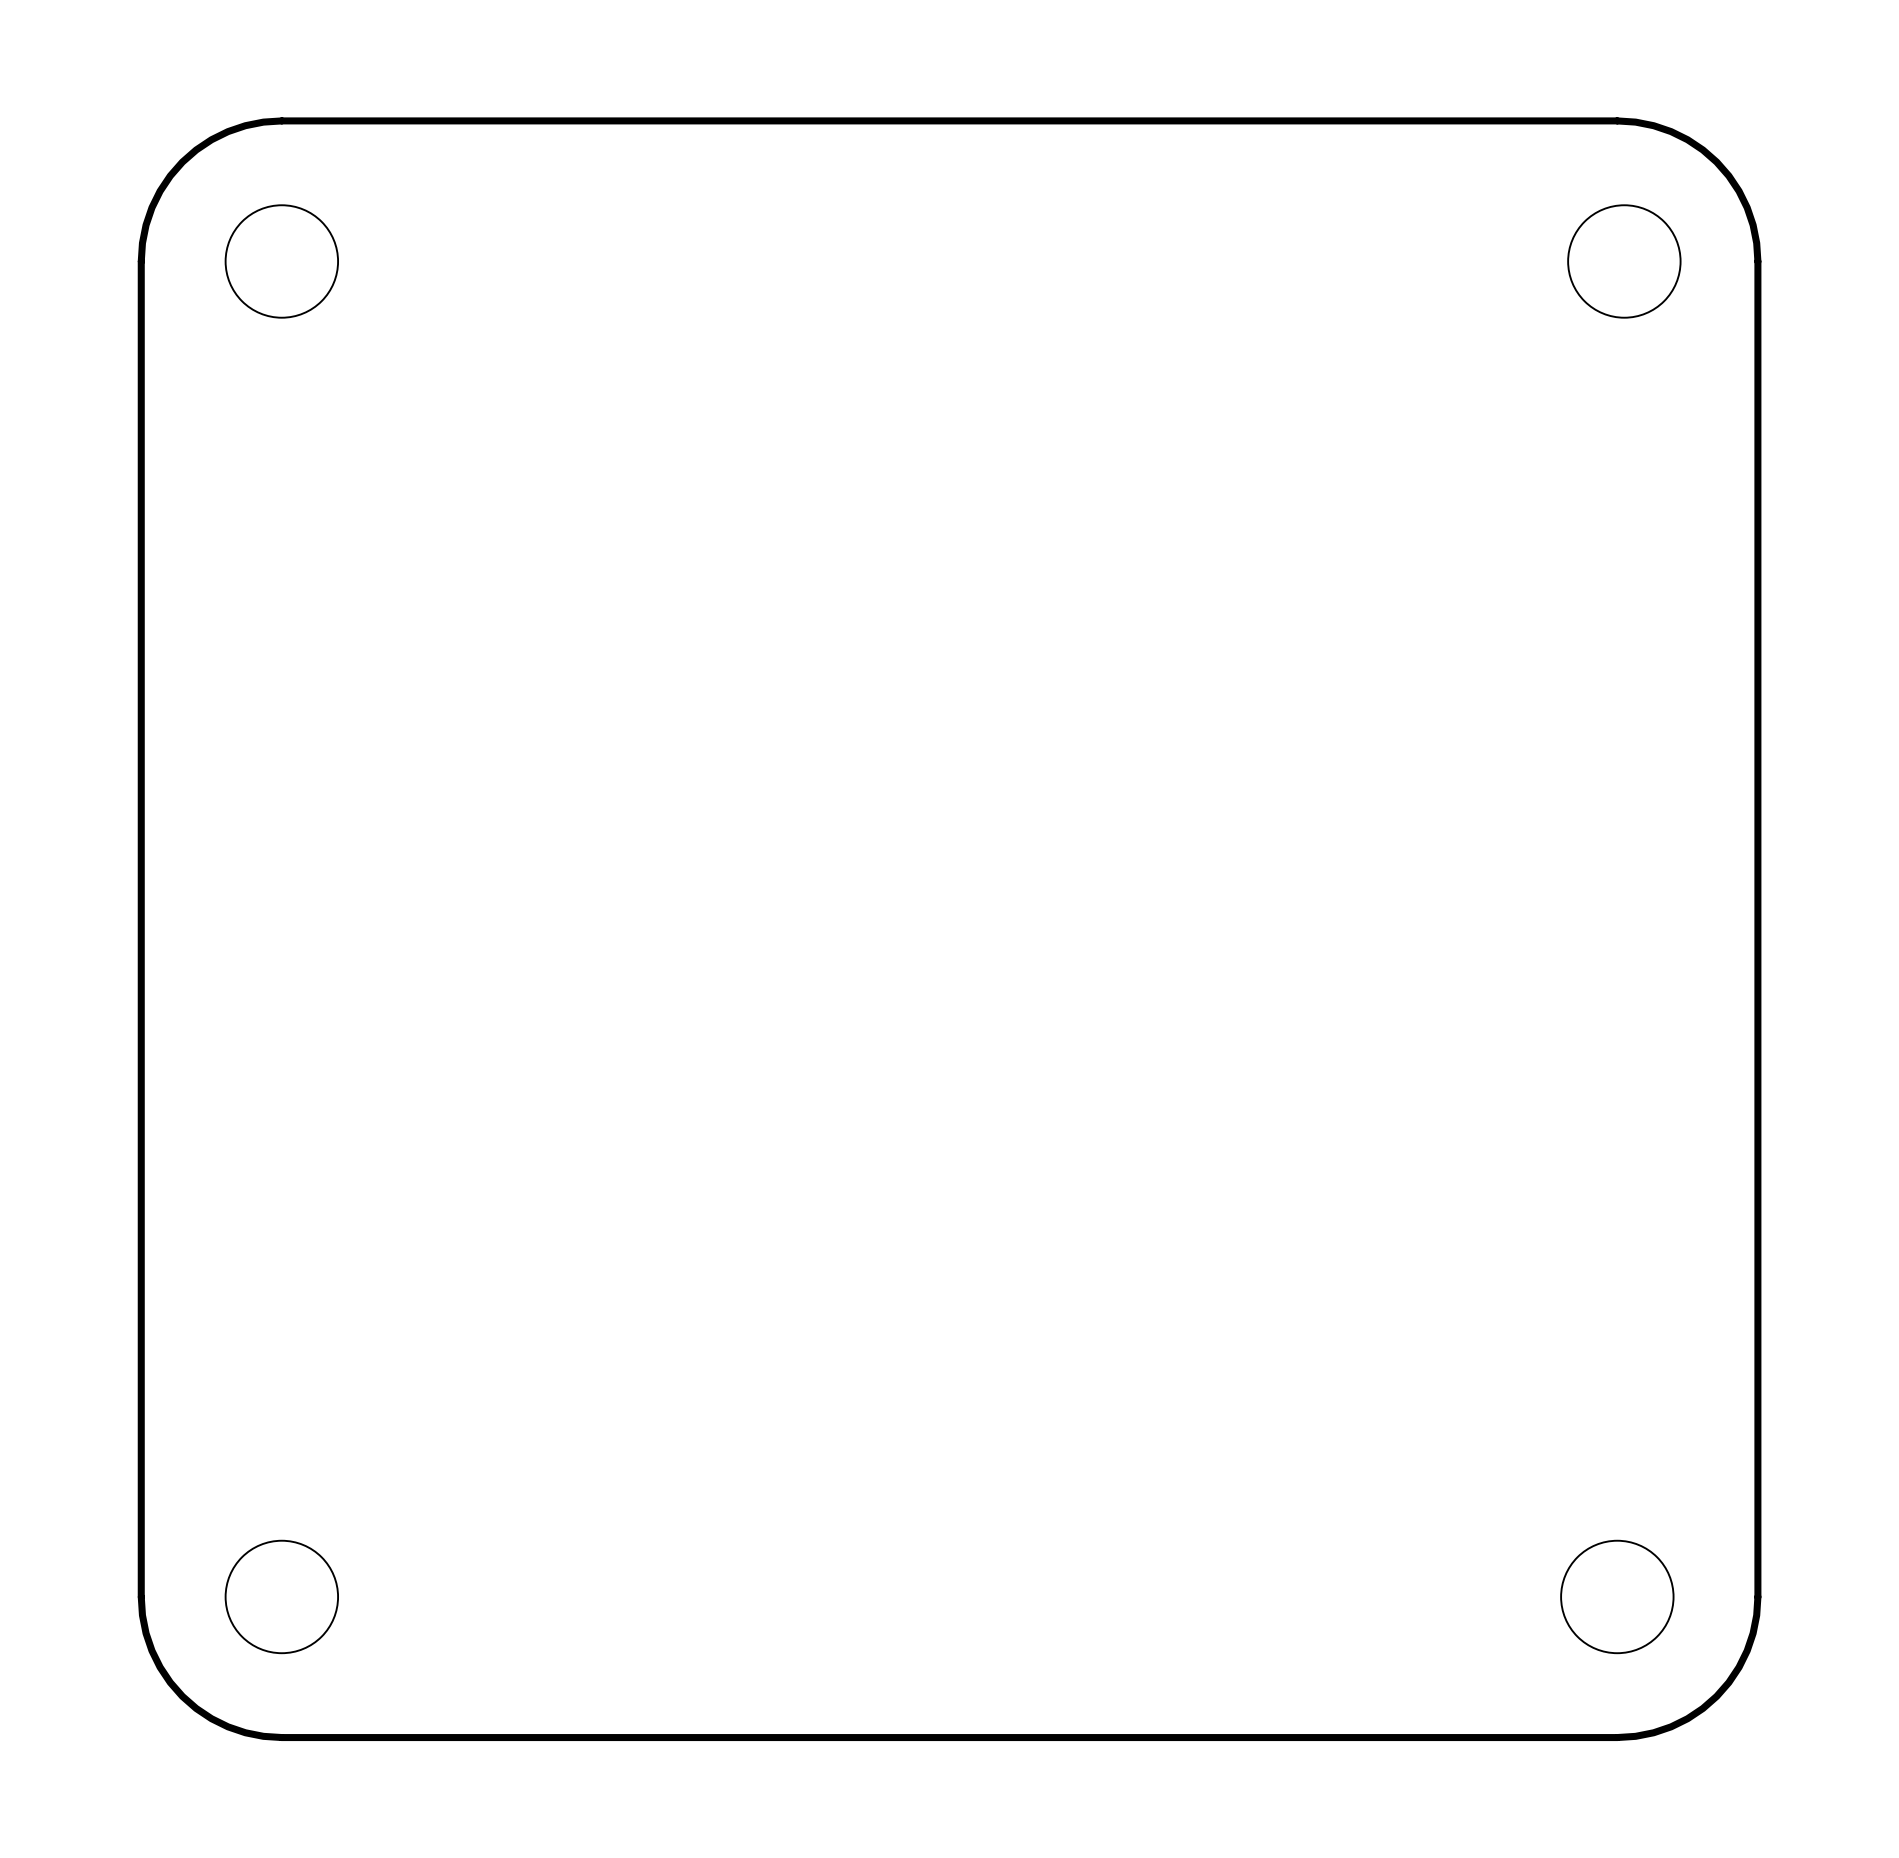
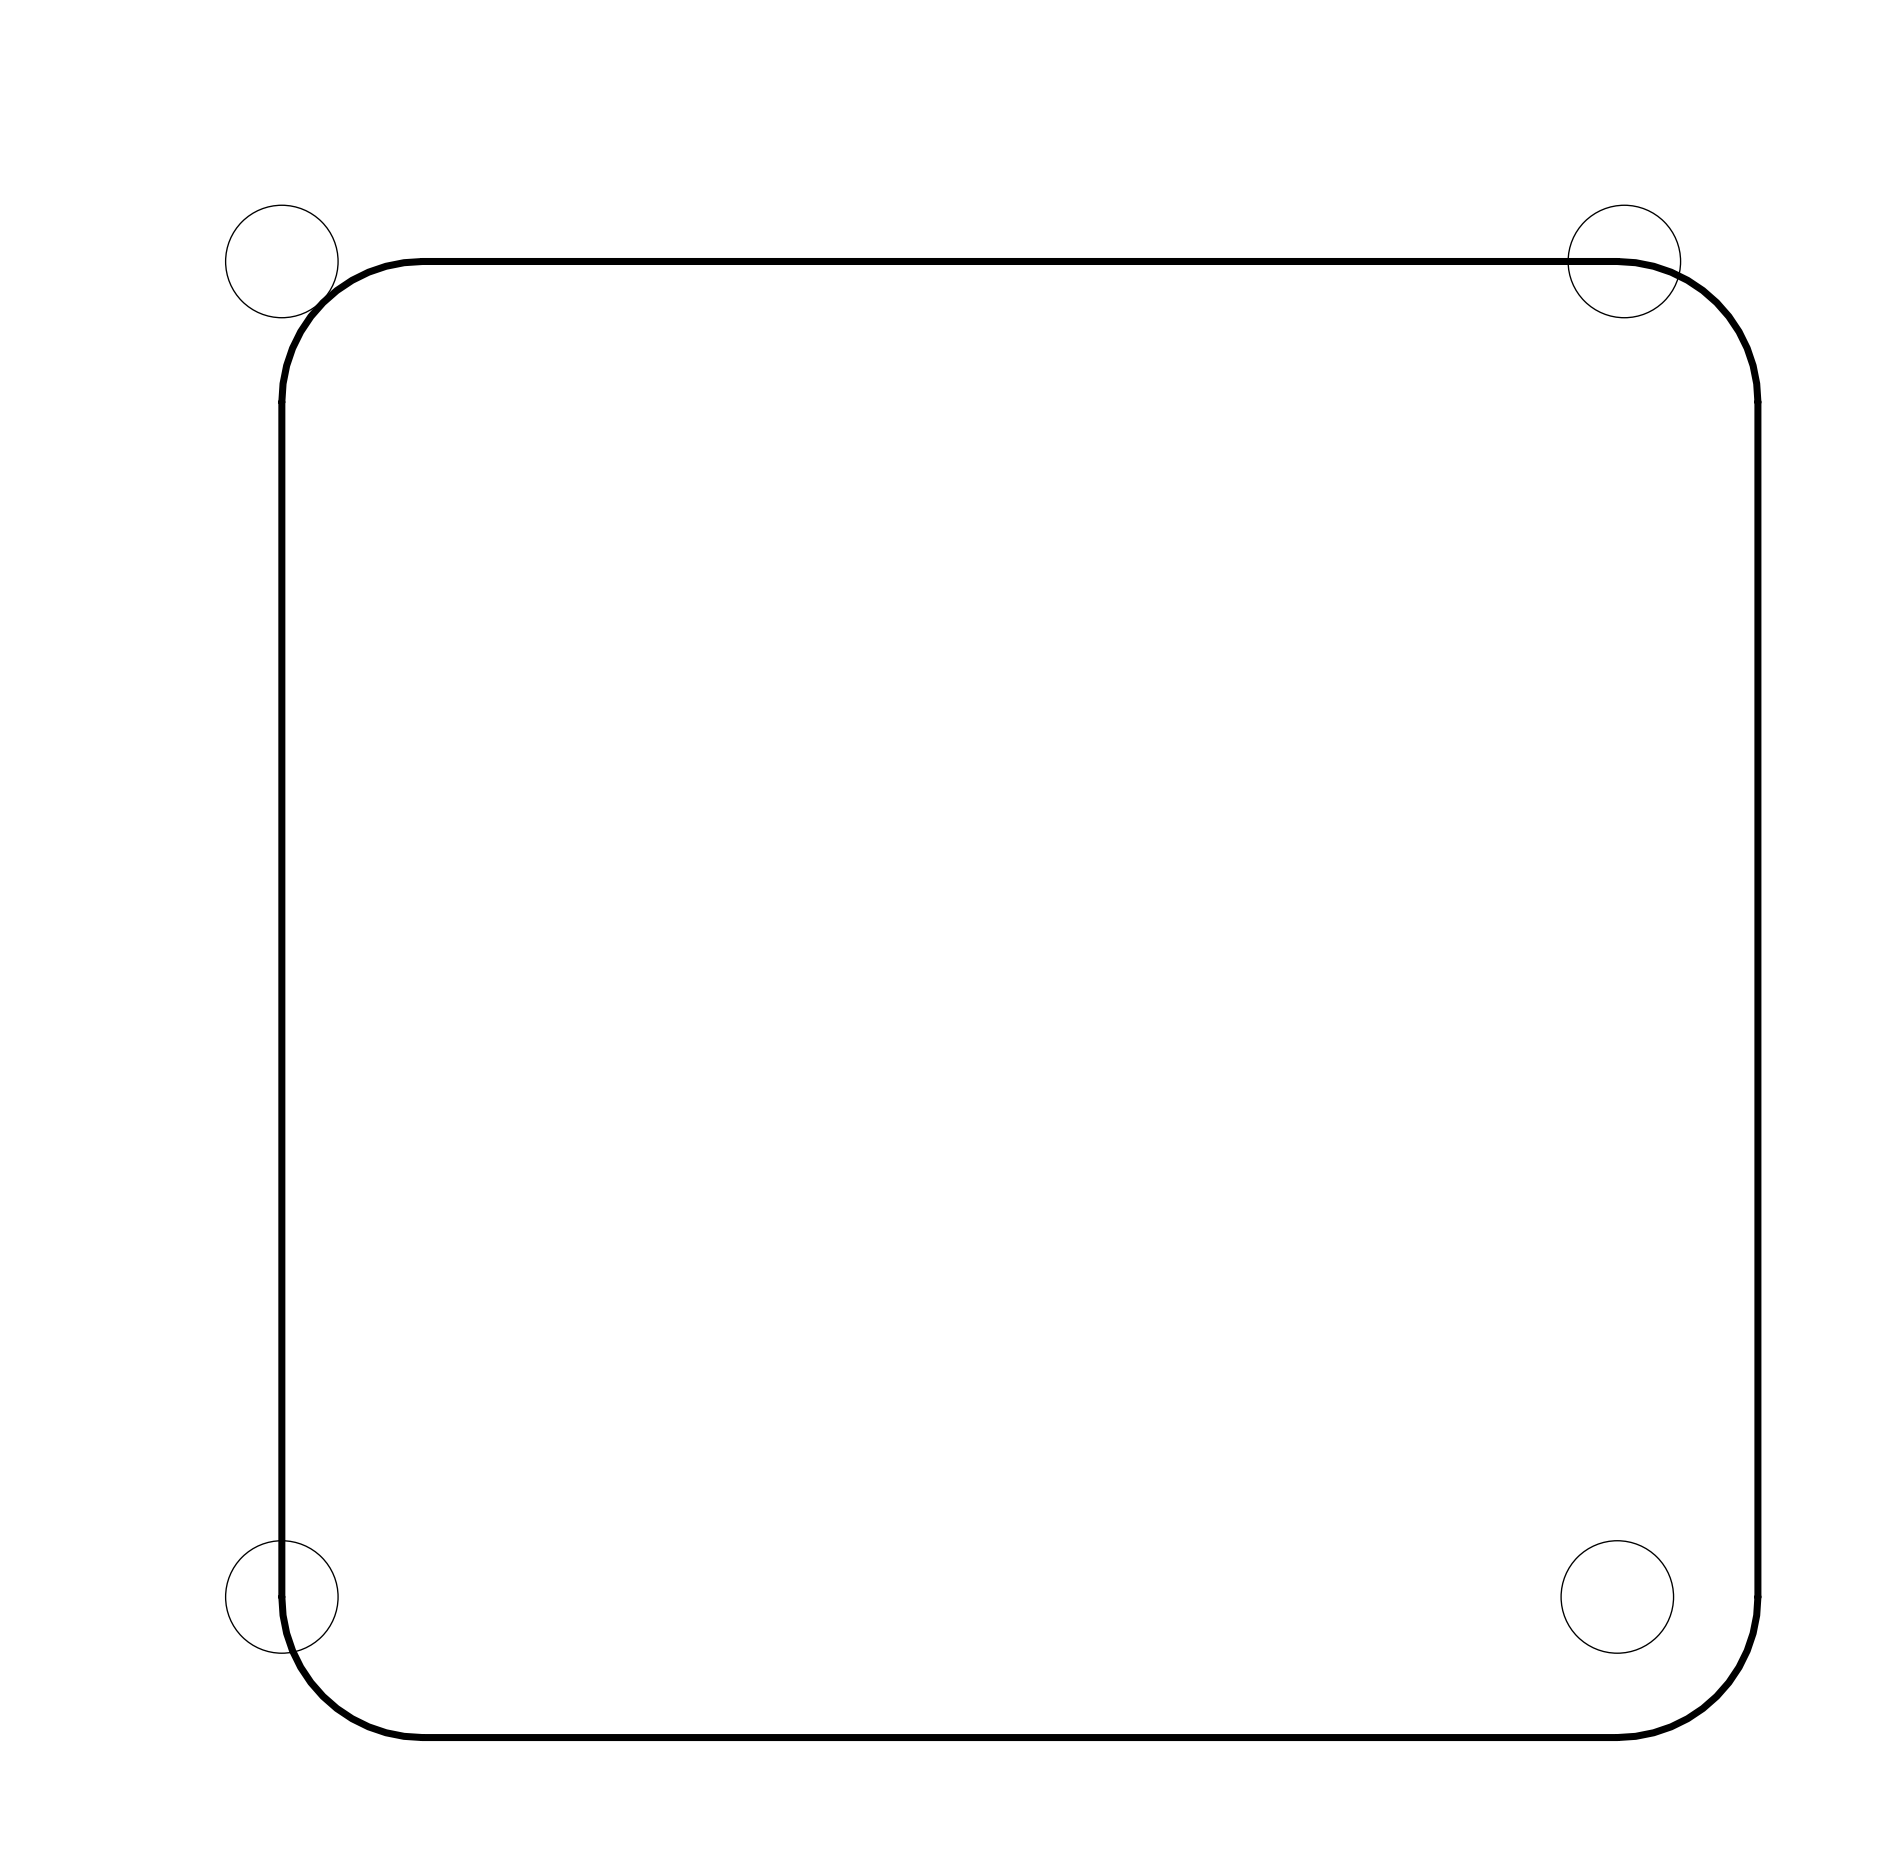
board edge: (1757, 402) (1757, 261) (1756, 243) (1747, 207) (1728, 175) (1702, 149) (1671, 131) (1635, 122) (281, 120) (263, 122) (228, 131) (211, 139) (182, 162) (170, 175) (151, 207) (146, 225) (141, 261) (142, 1615) (151, 1650) (170, 1682) (196, 1708) (228, 1726) (245, 1732) (281, 1737) (422, 1737) -> (1757, 402) (1756, 383) (1747, 348) (1728, 316) (1716, 302) (1687, 280) (1671, 272) (1635, 262) (422, 261) (404, 262) (368, 272) (352, 280) (323, 302) (310, 316) (292, 348) (286, 365) (281, 402) (283, 1615) (286, 1633) (300, 1667) (310, 1682) (336, 1708) (368, 1726) (386, 1732) (422, 1737)

